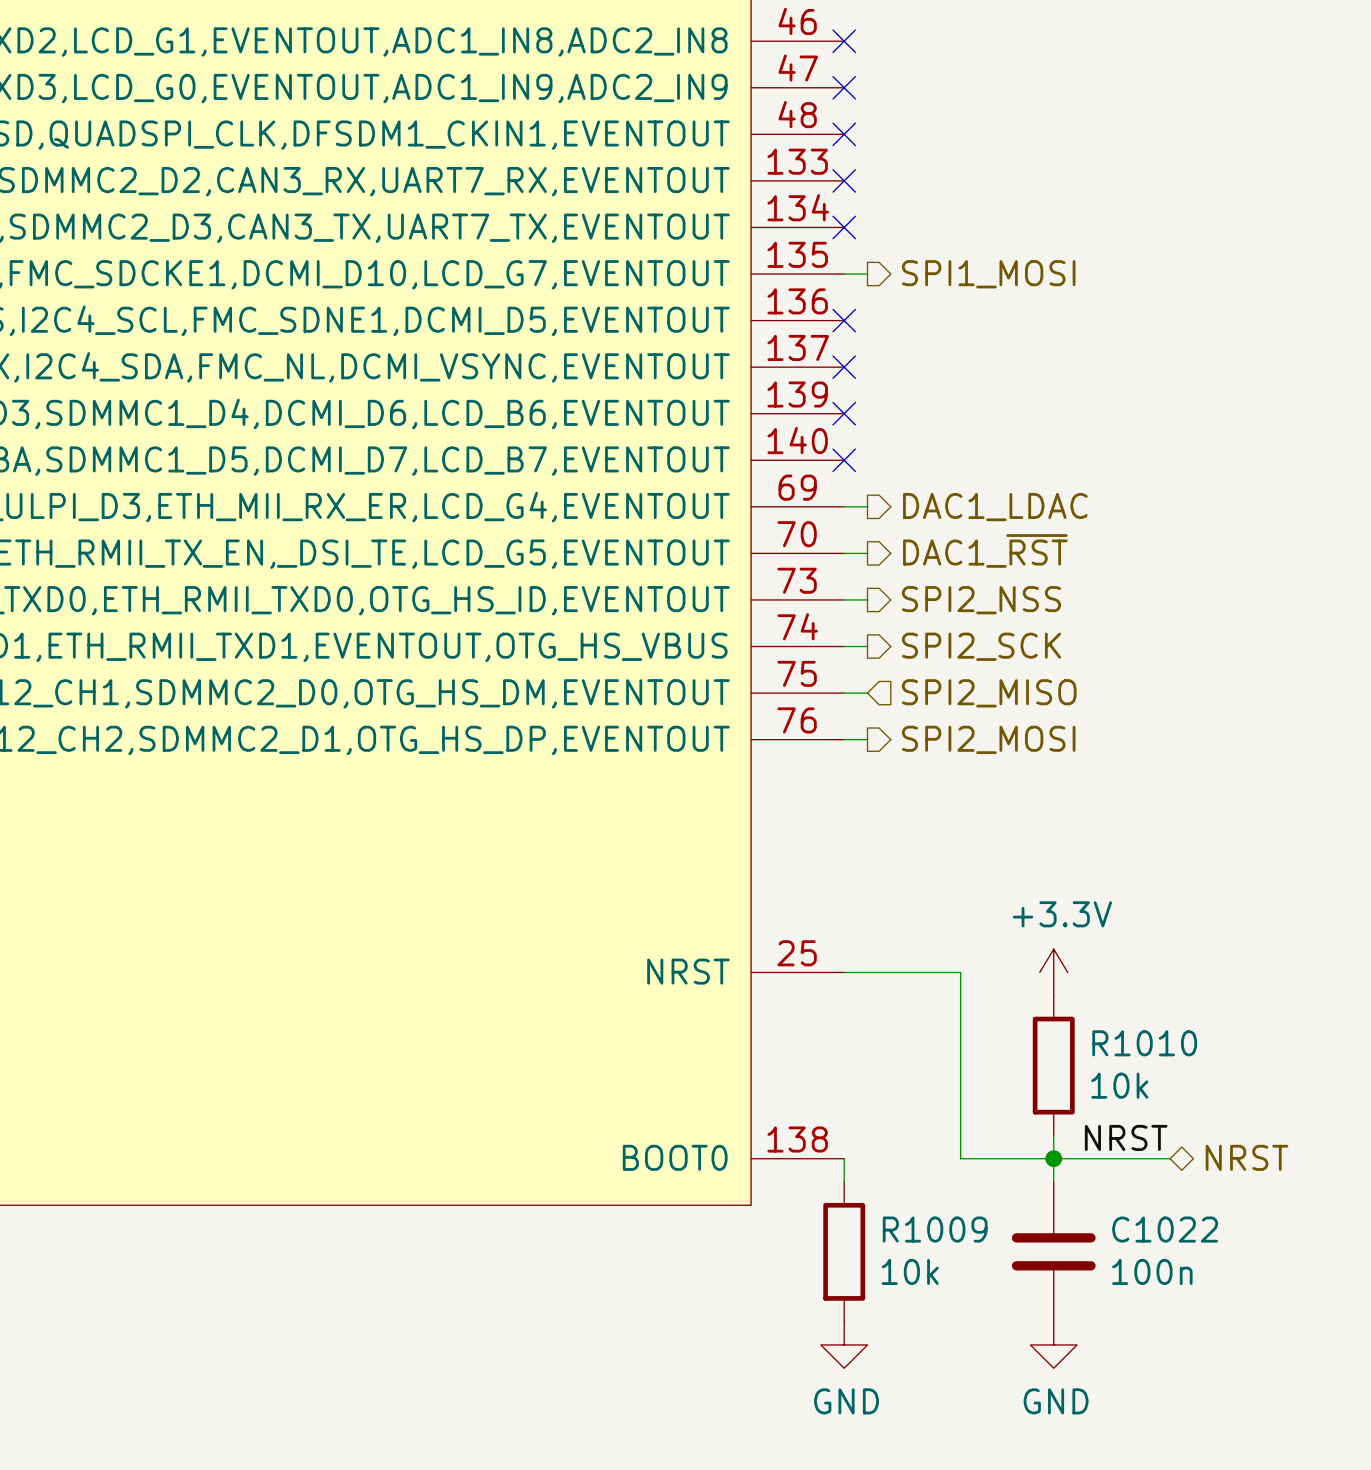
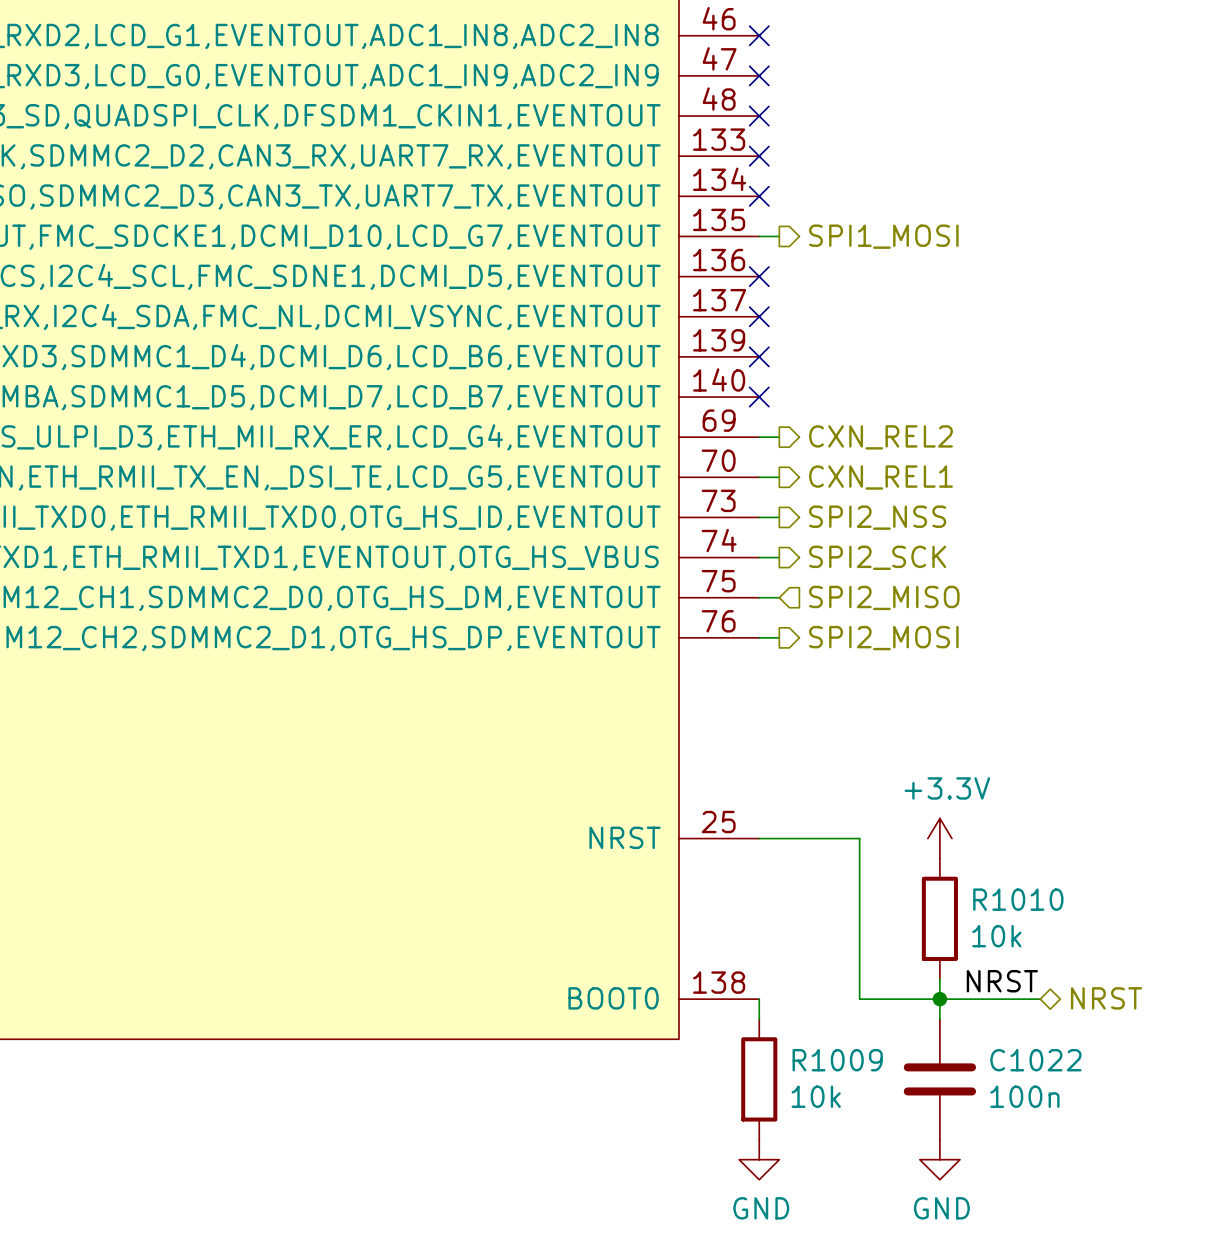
hierarchical label: DAC1_LDAC (995, 507) -> CXN_REL2 (880, 437)
hierarchical label: DAC1_~{RST} (985, 550) -> CXN_REL1 (880, 477)

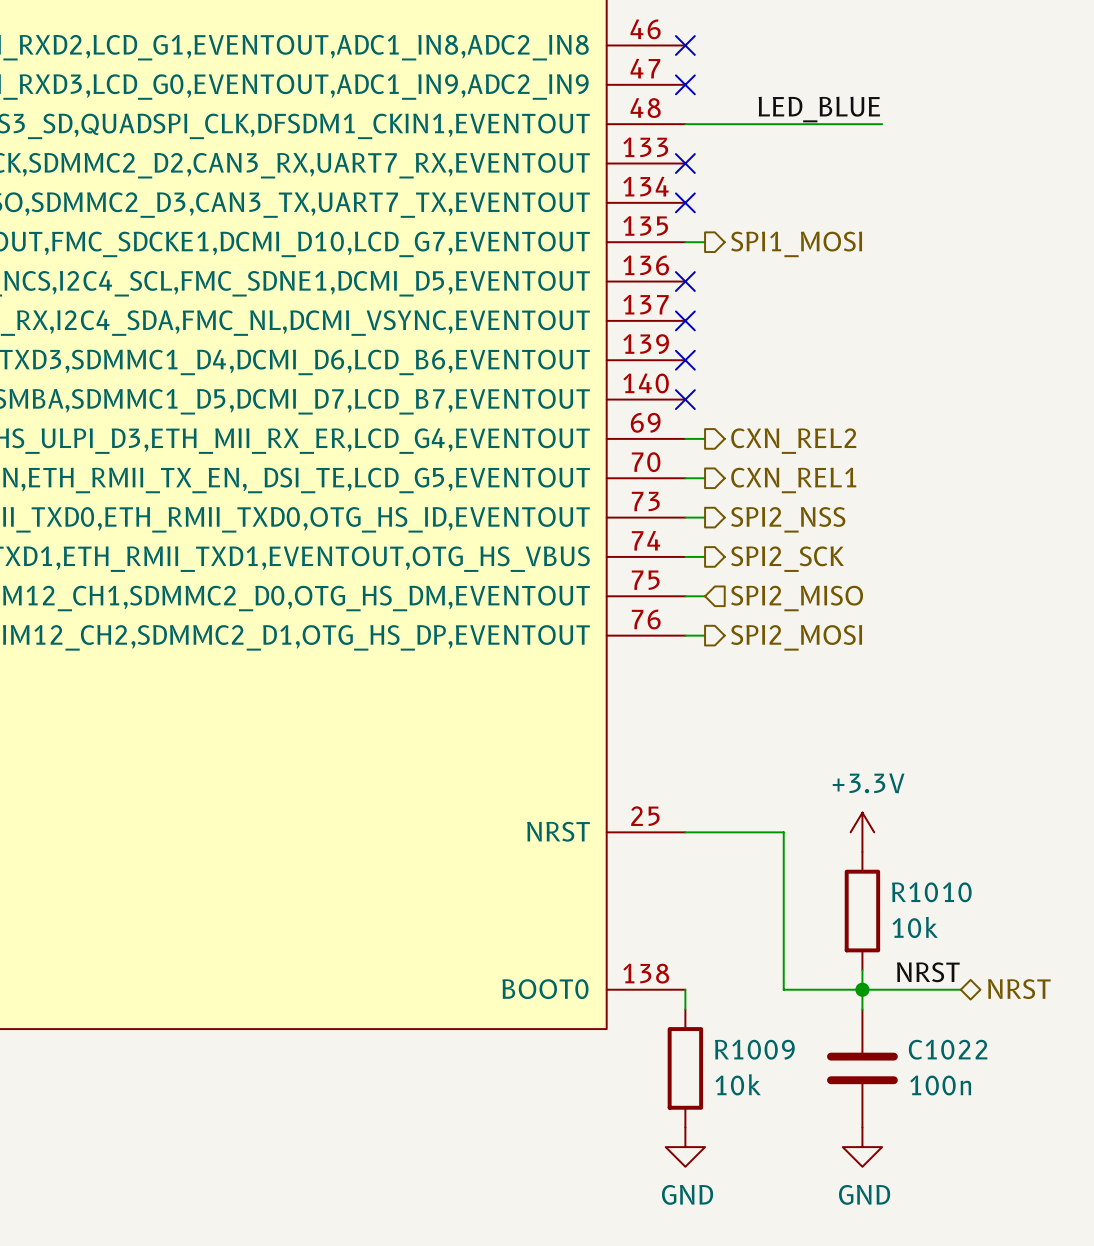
label: none -> LED_BLUE (819, 109)
wire: none -> (685, 124) (882, 124)
no-connect mark: (759, 116) -> none

